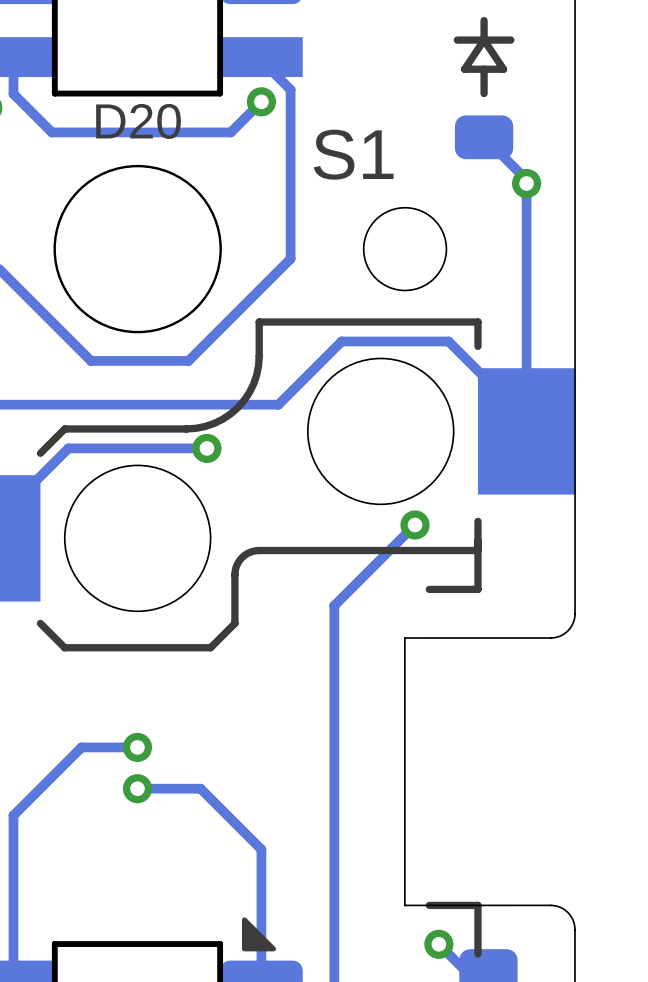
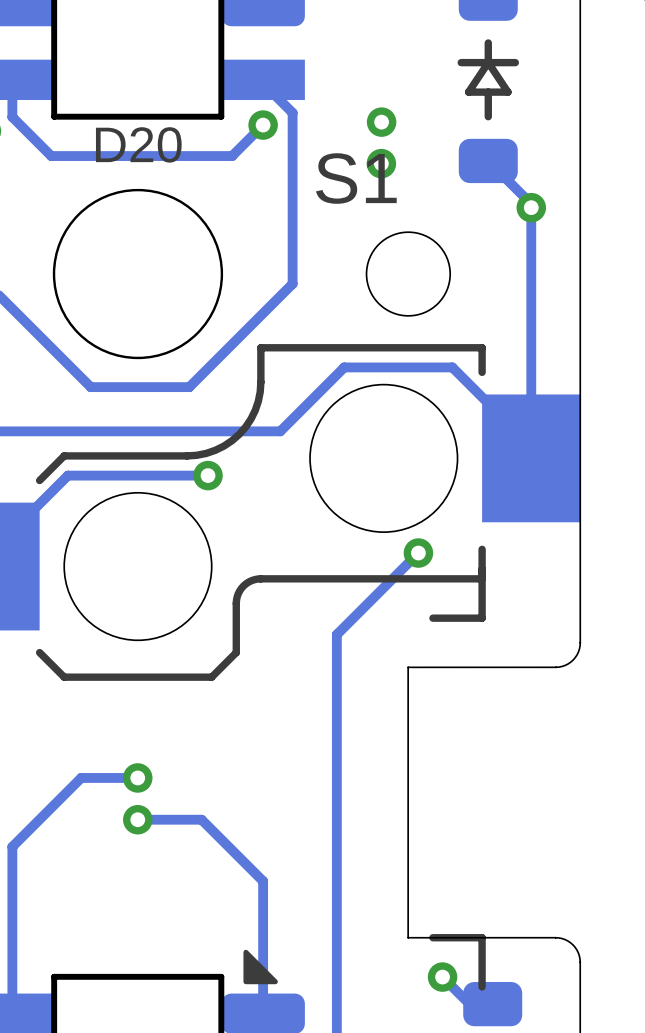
via: none -> (381, 122)
via: none -> (381, 163)

